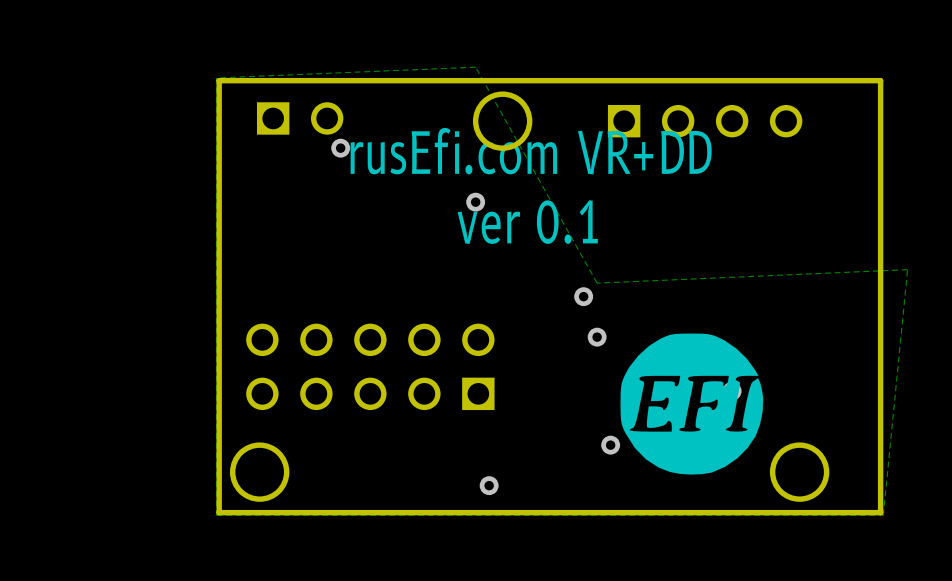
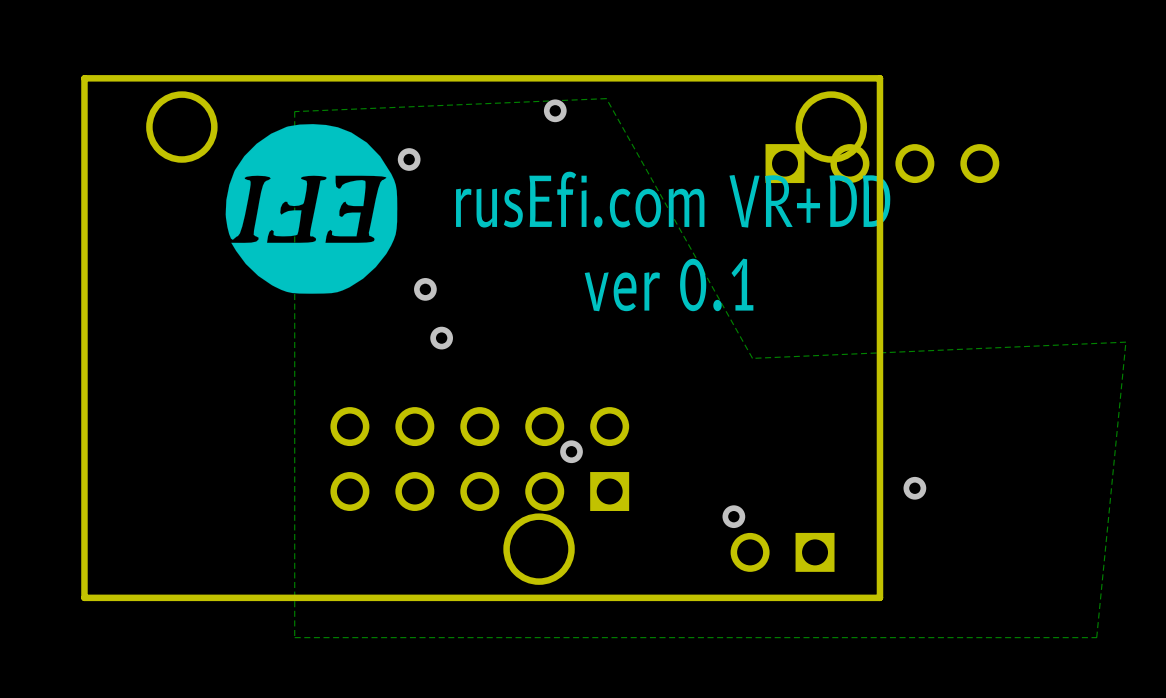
round board edge: none -> [146, 91, 218, 163]
via: none -> (555, 110)
board edge: (880, 80) (219, 80) (219, 512) (880, 512) (880, 80) -> (879, 78) (84, 78) (84, 597) (879, 597) (879, 78)
drawing: none -> [225, 124, 398, 294]
via: none -> (409, 159)
part rotation: 0° (300, 118) -> 180° (782, 552)
part position: (300, 118) -> (782, 552)
round board edge position: (502, 121) -> (831, 127)
via: (340, 148) -> none
via: (475, 202) -> none
via: none -> (425, 289)
via: none -> (441, 338)
via: (583, 296) -> none
drawing: [620, 333, 764, 475] -> none
via: (597, 337) -> none
via: none -> (571, 451)
via: none -> (733, 516)
round board edge: [769, 442, 830, 502] -> none
via: (610, 445) -> none
round board edge position: (259, 472) -> (539, 549)
via: (489, 485) -> none

